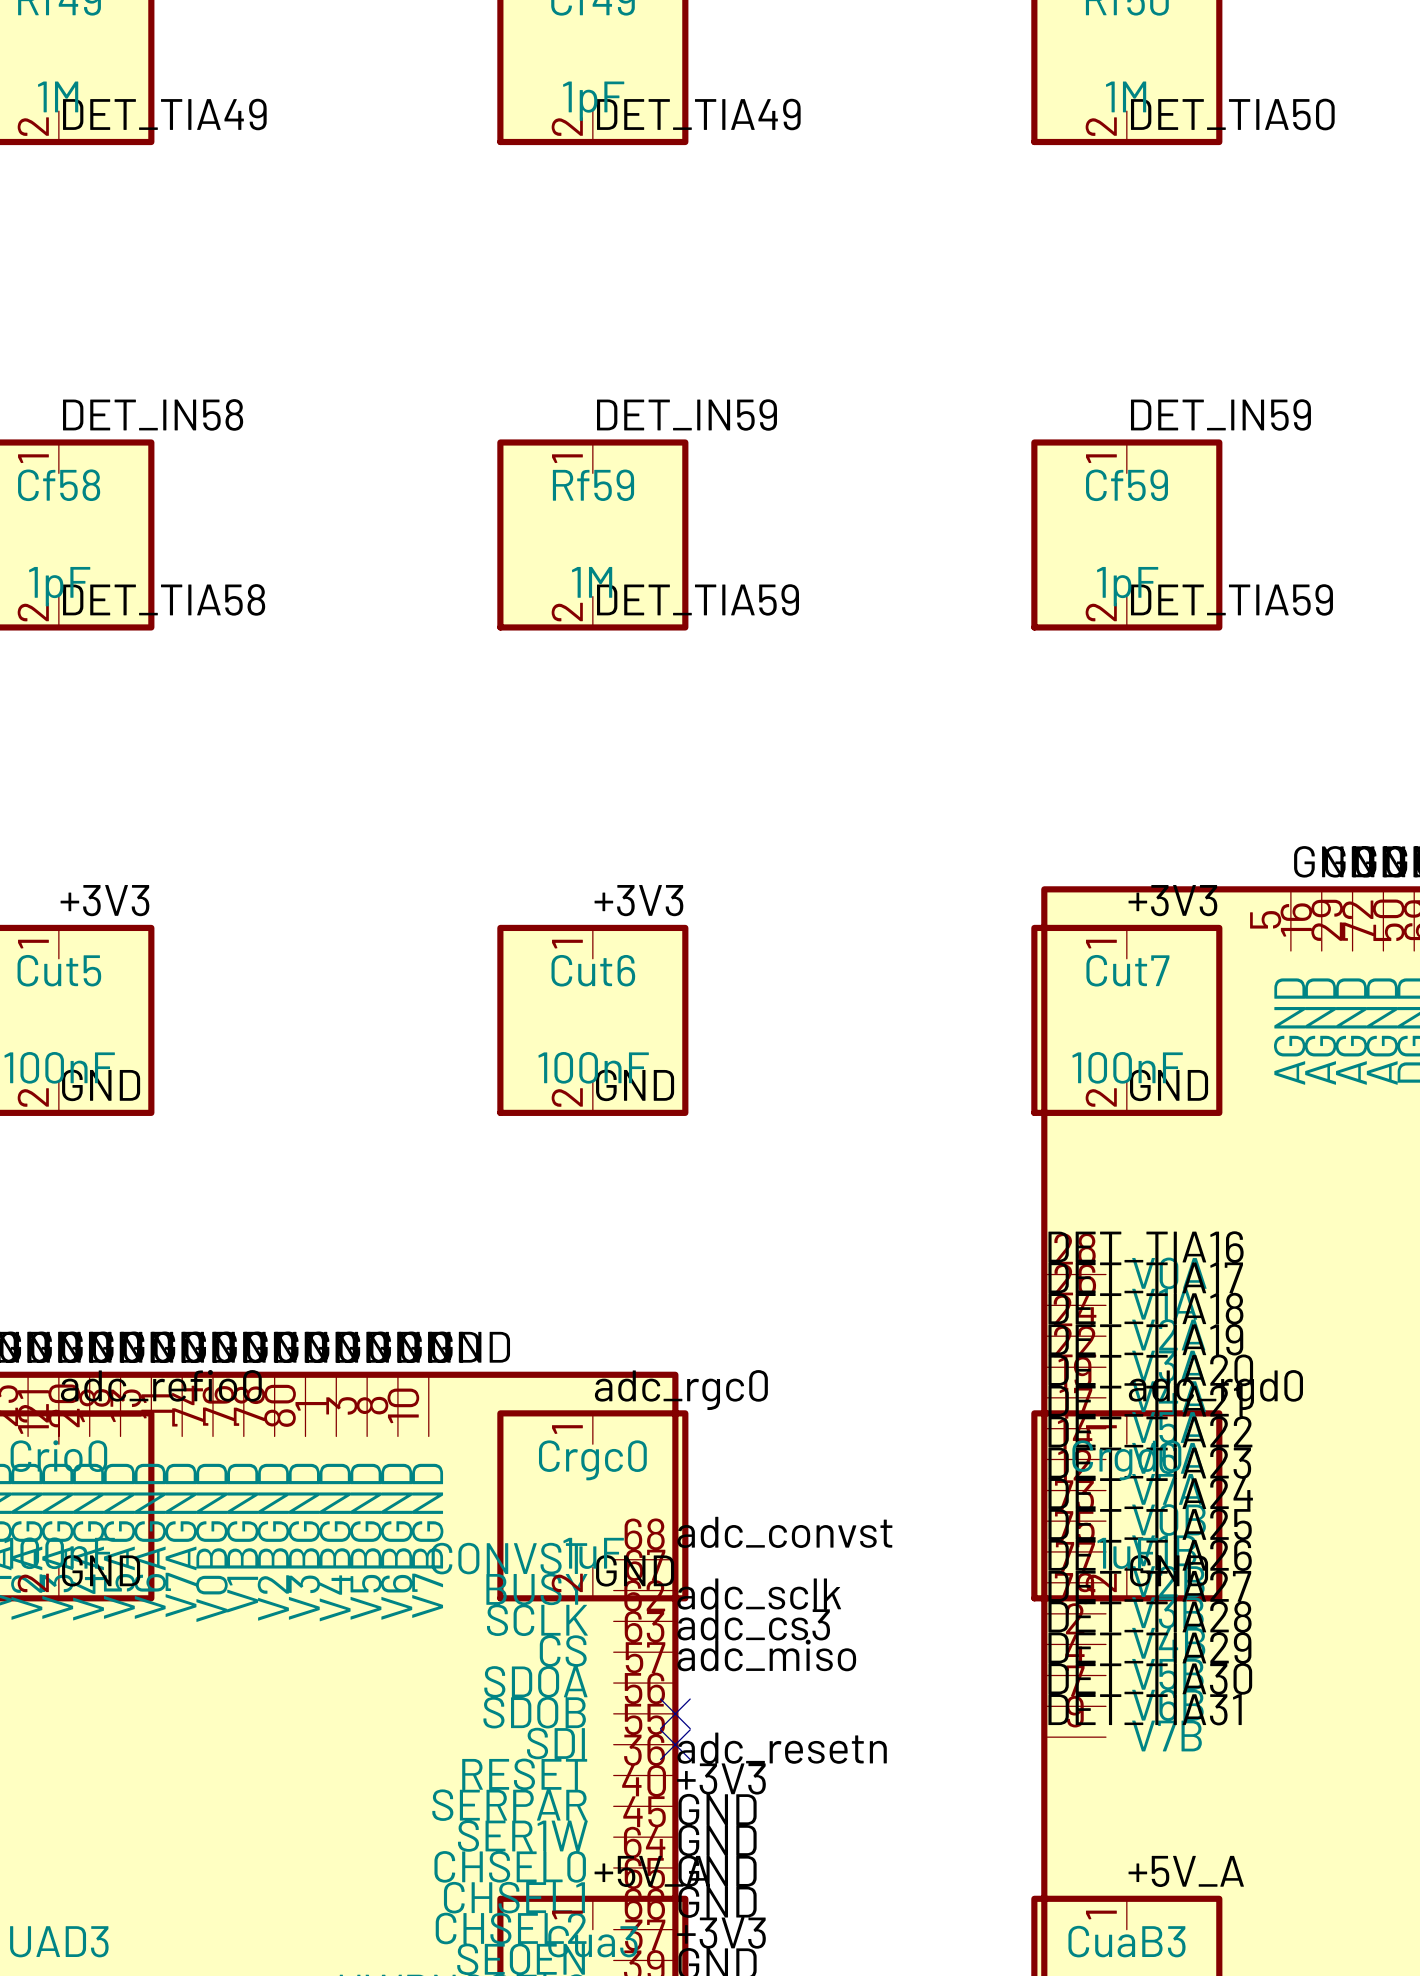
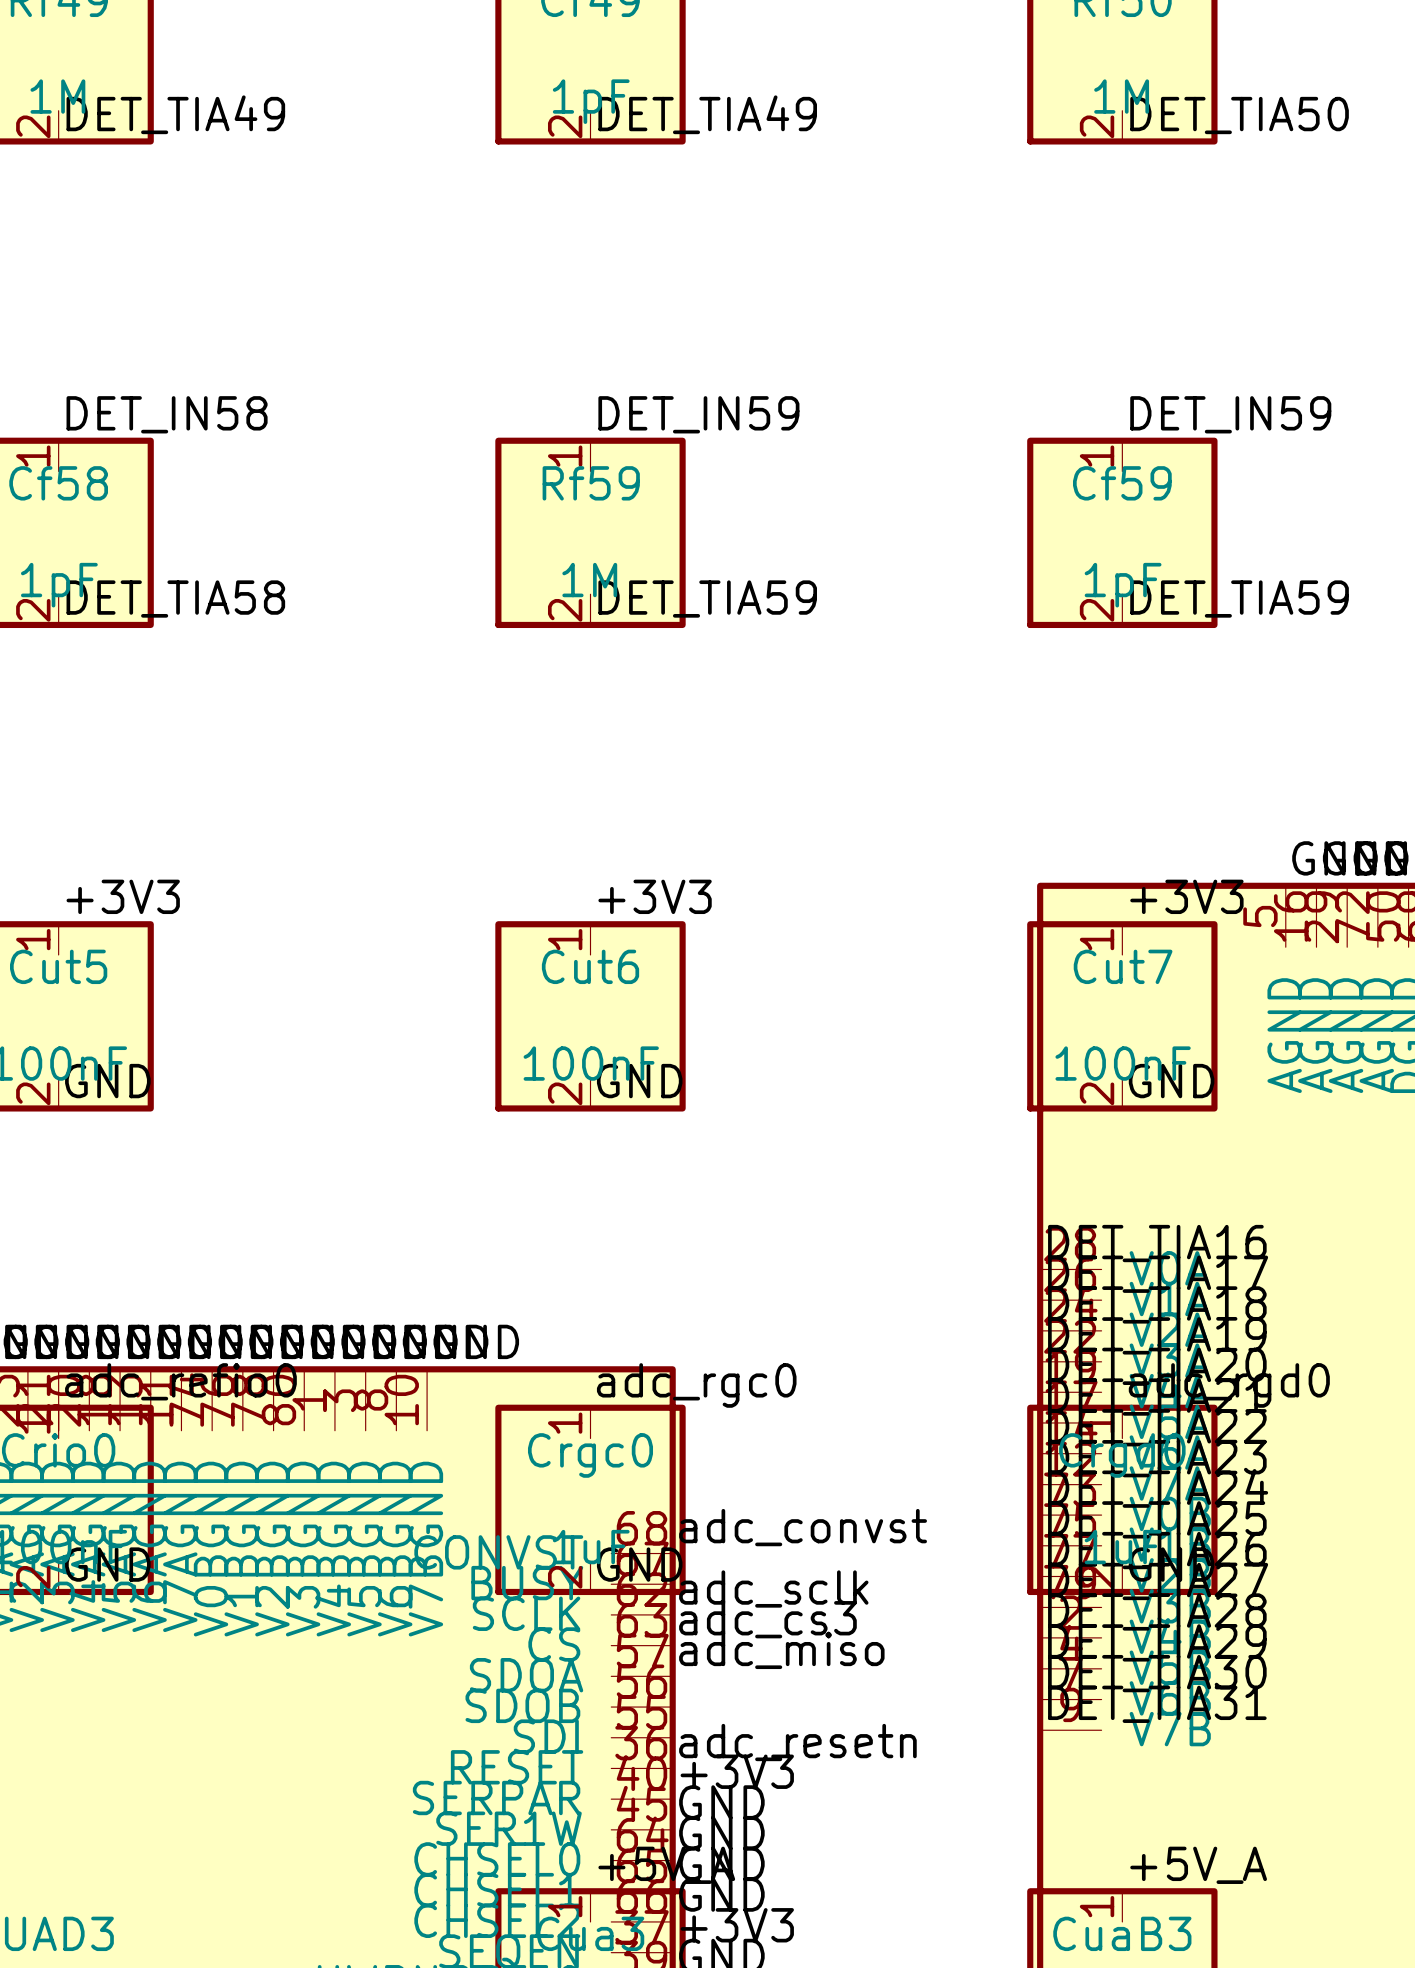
no-connect mark: (675, 1713) -> none
no-connect mark: (675, 1744) -> none

